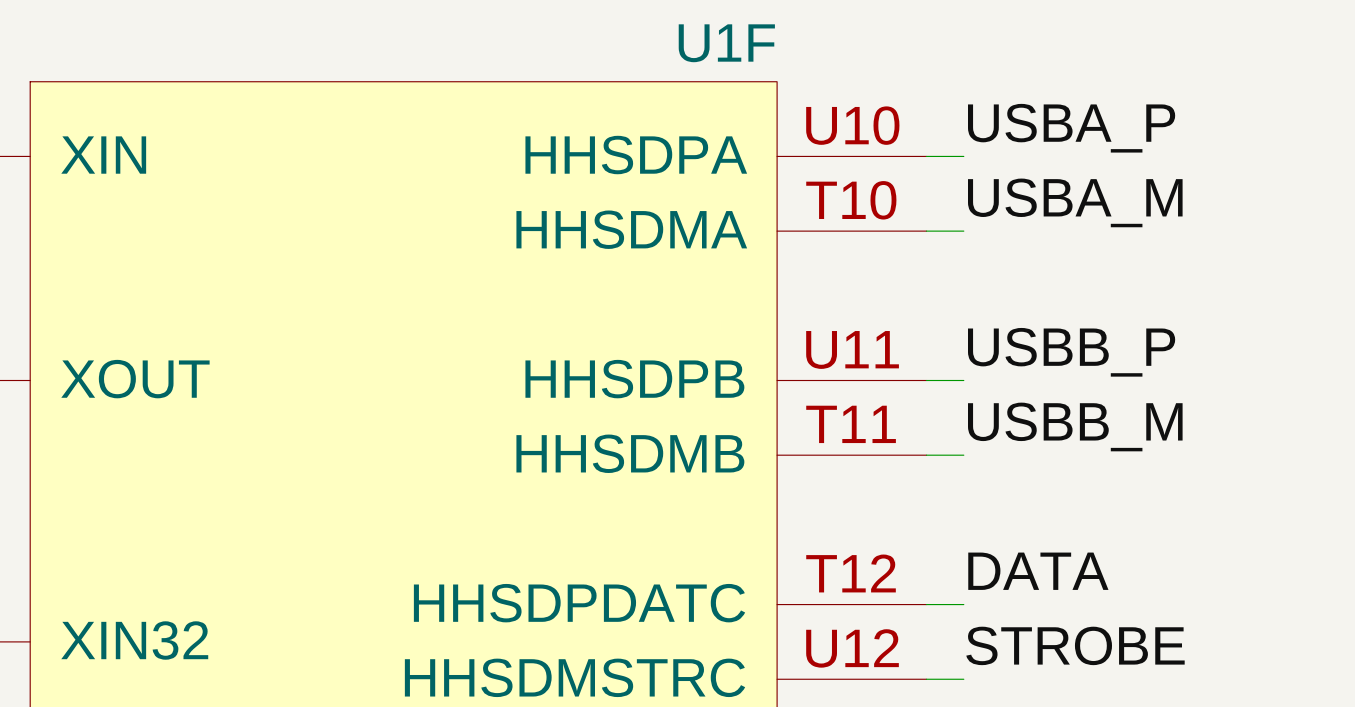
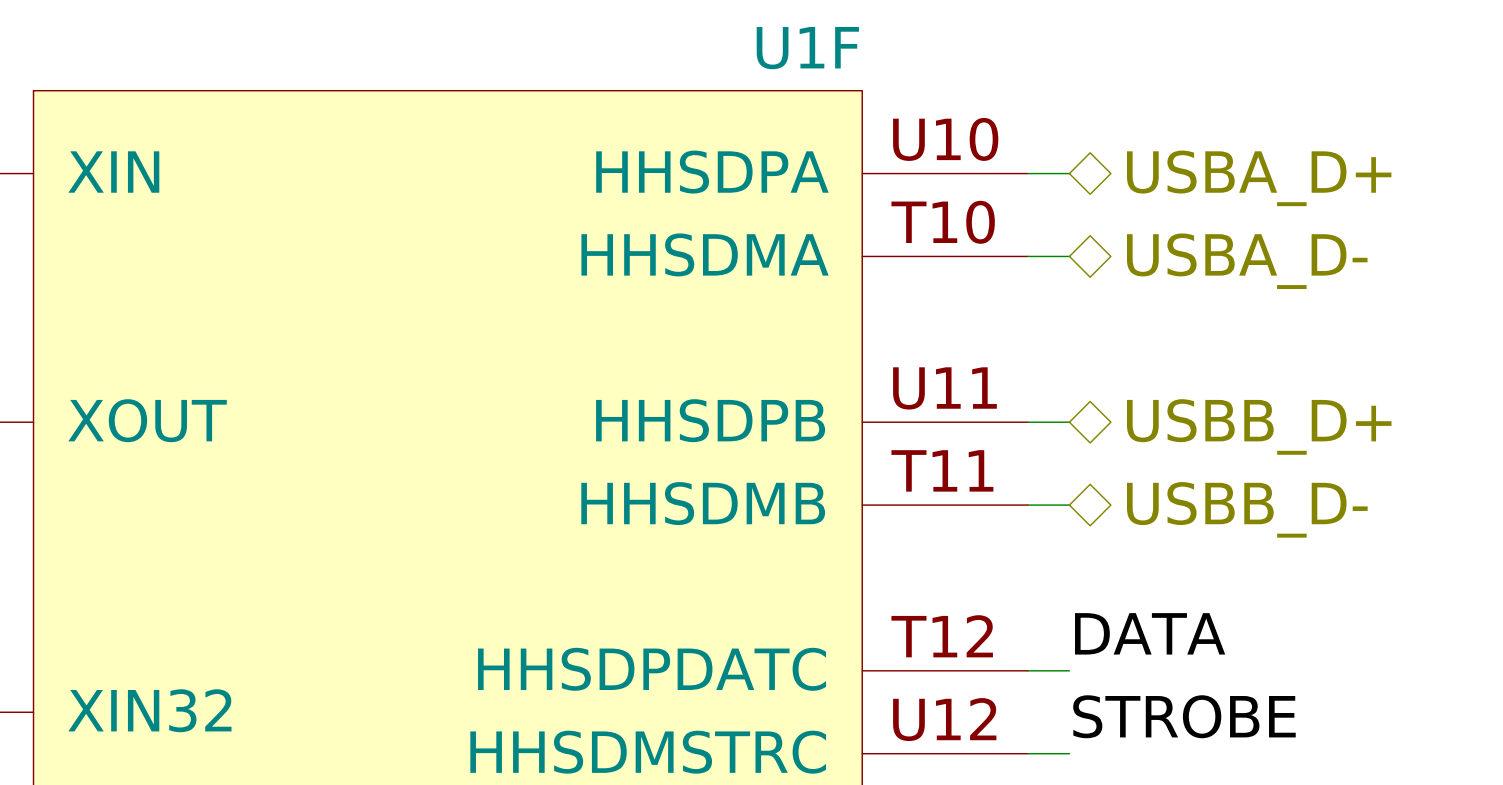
label: USBA_P (1071, 128) -> none
hierarchical label: none -> USBA_D+ (1259, 178)
label: USBA_M (1075, 202) -> none
hierarchical label: none -> USBA_D- (1247, 261)
label: USBB_P (1071, 352) -> none
hierarchical label: none -> USBB_D+ (1259, 426)
label: USBB_M (1075, 426) -> none
hierarchical label: none -> USBB_D- (1247, 509)

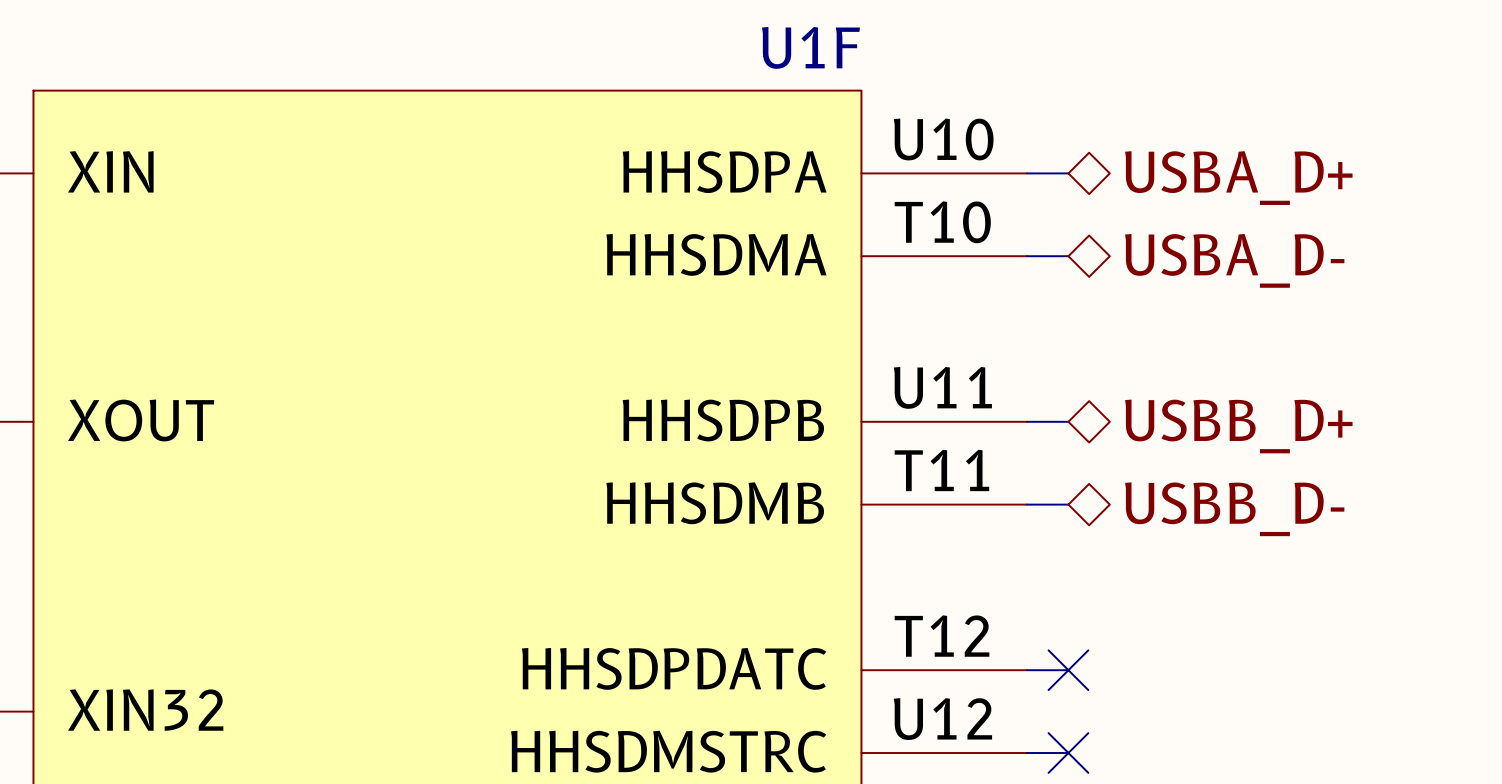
label: DATA (1150, 633) -> none
no-connect mark: none -> (1068, 670)
label: STROBE (1184, 716) -> none
no-connect mark: none -> (1068, 753)

